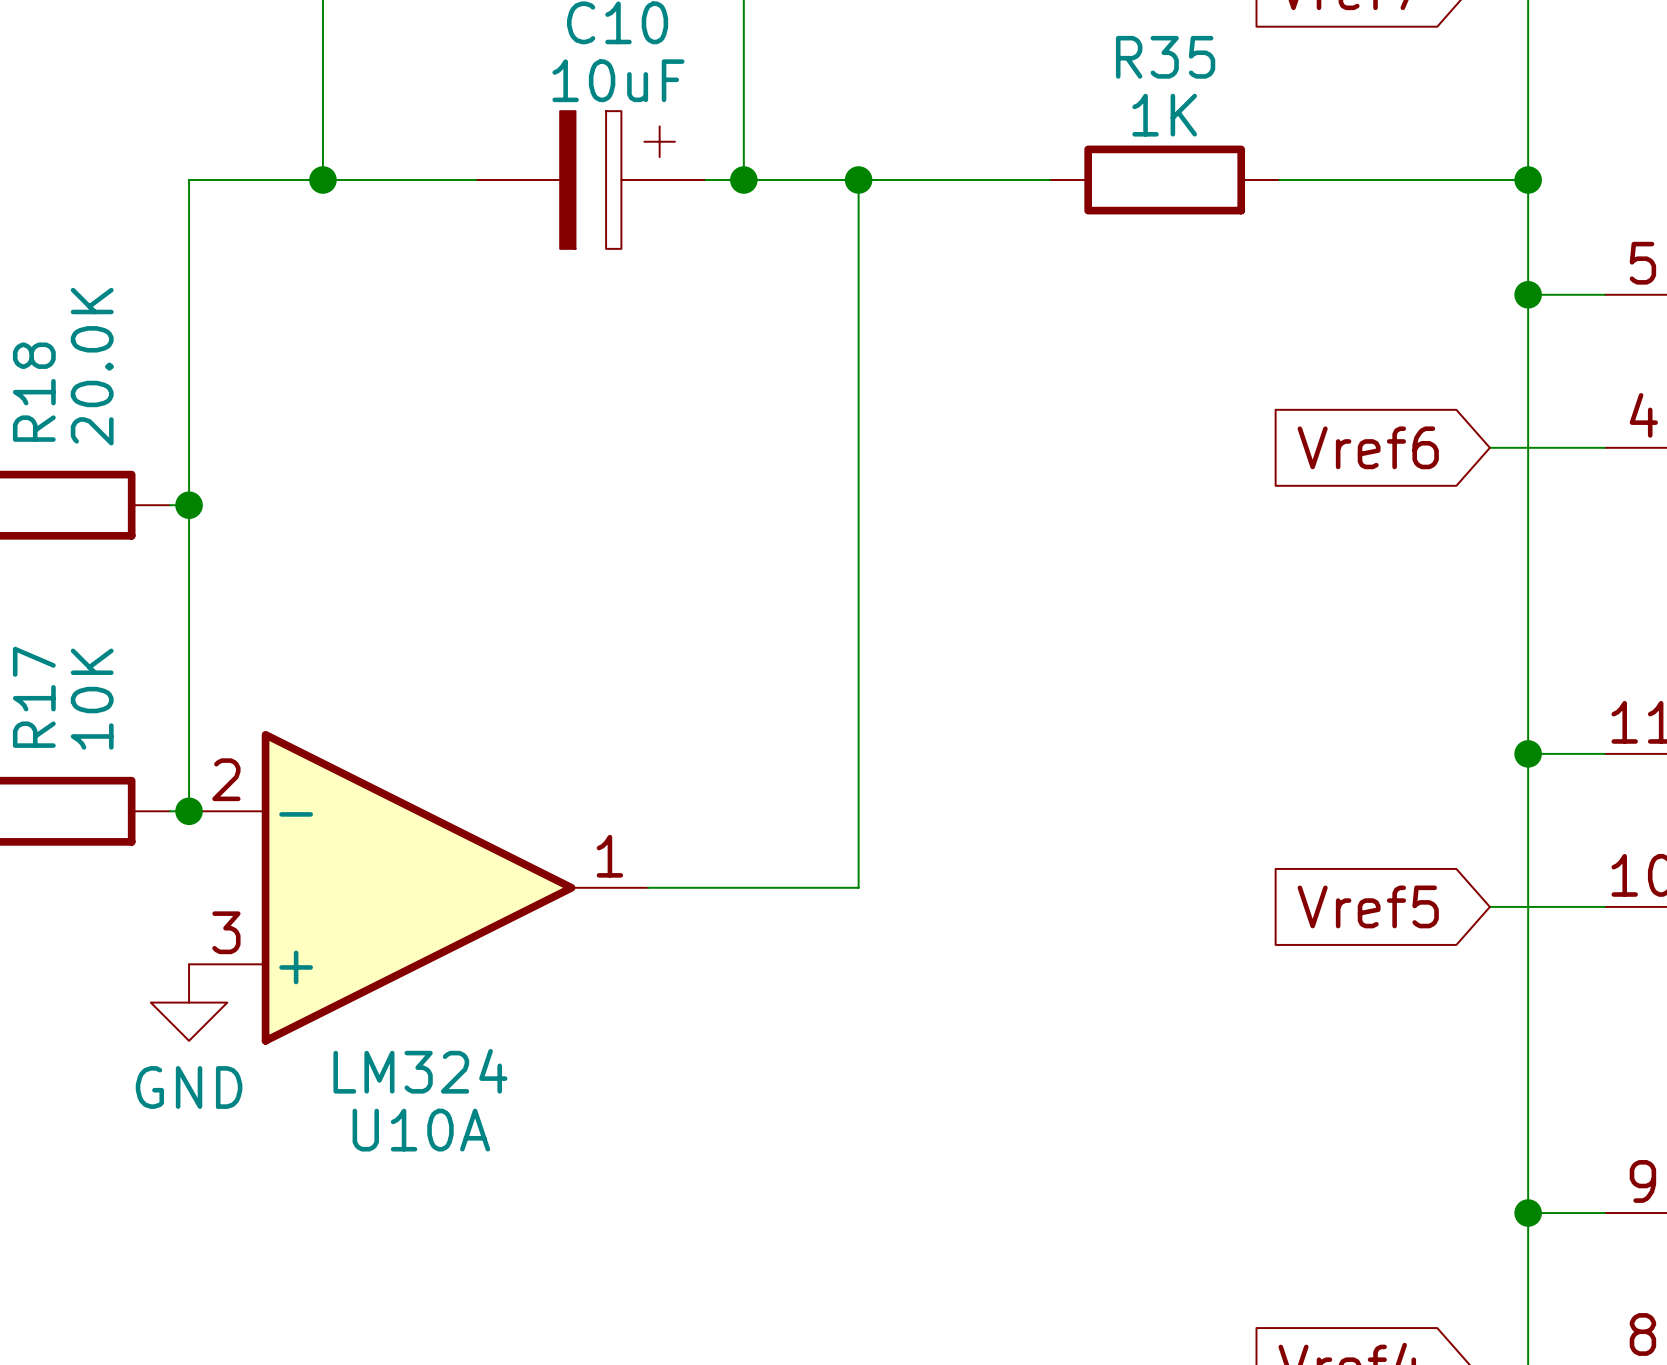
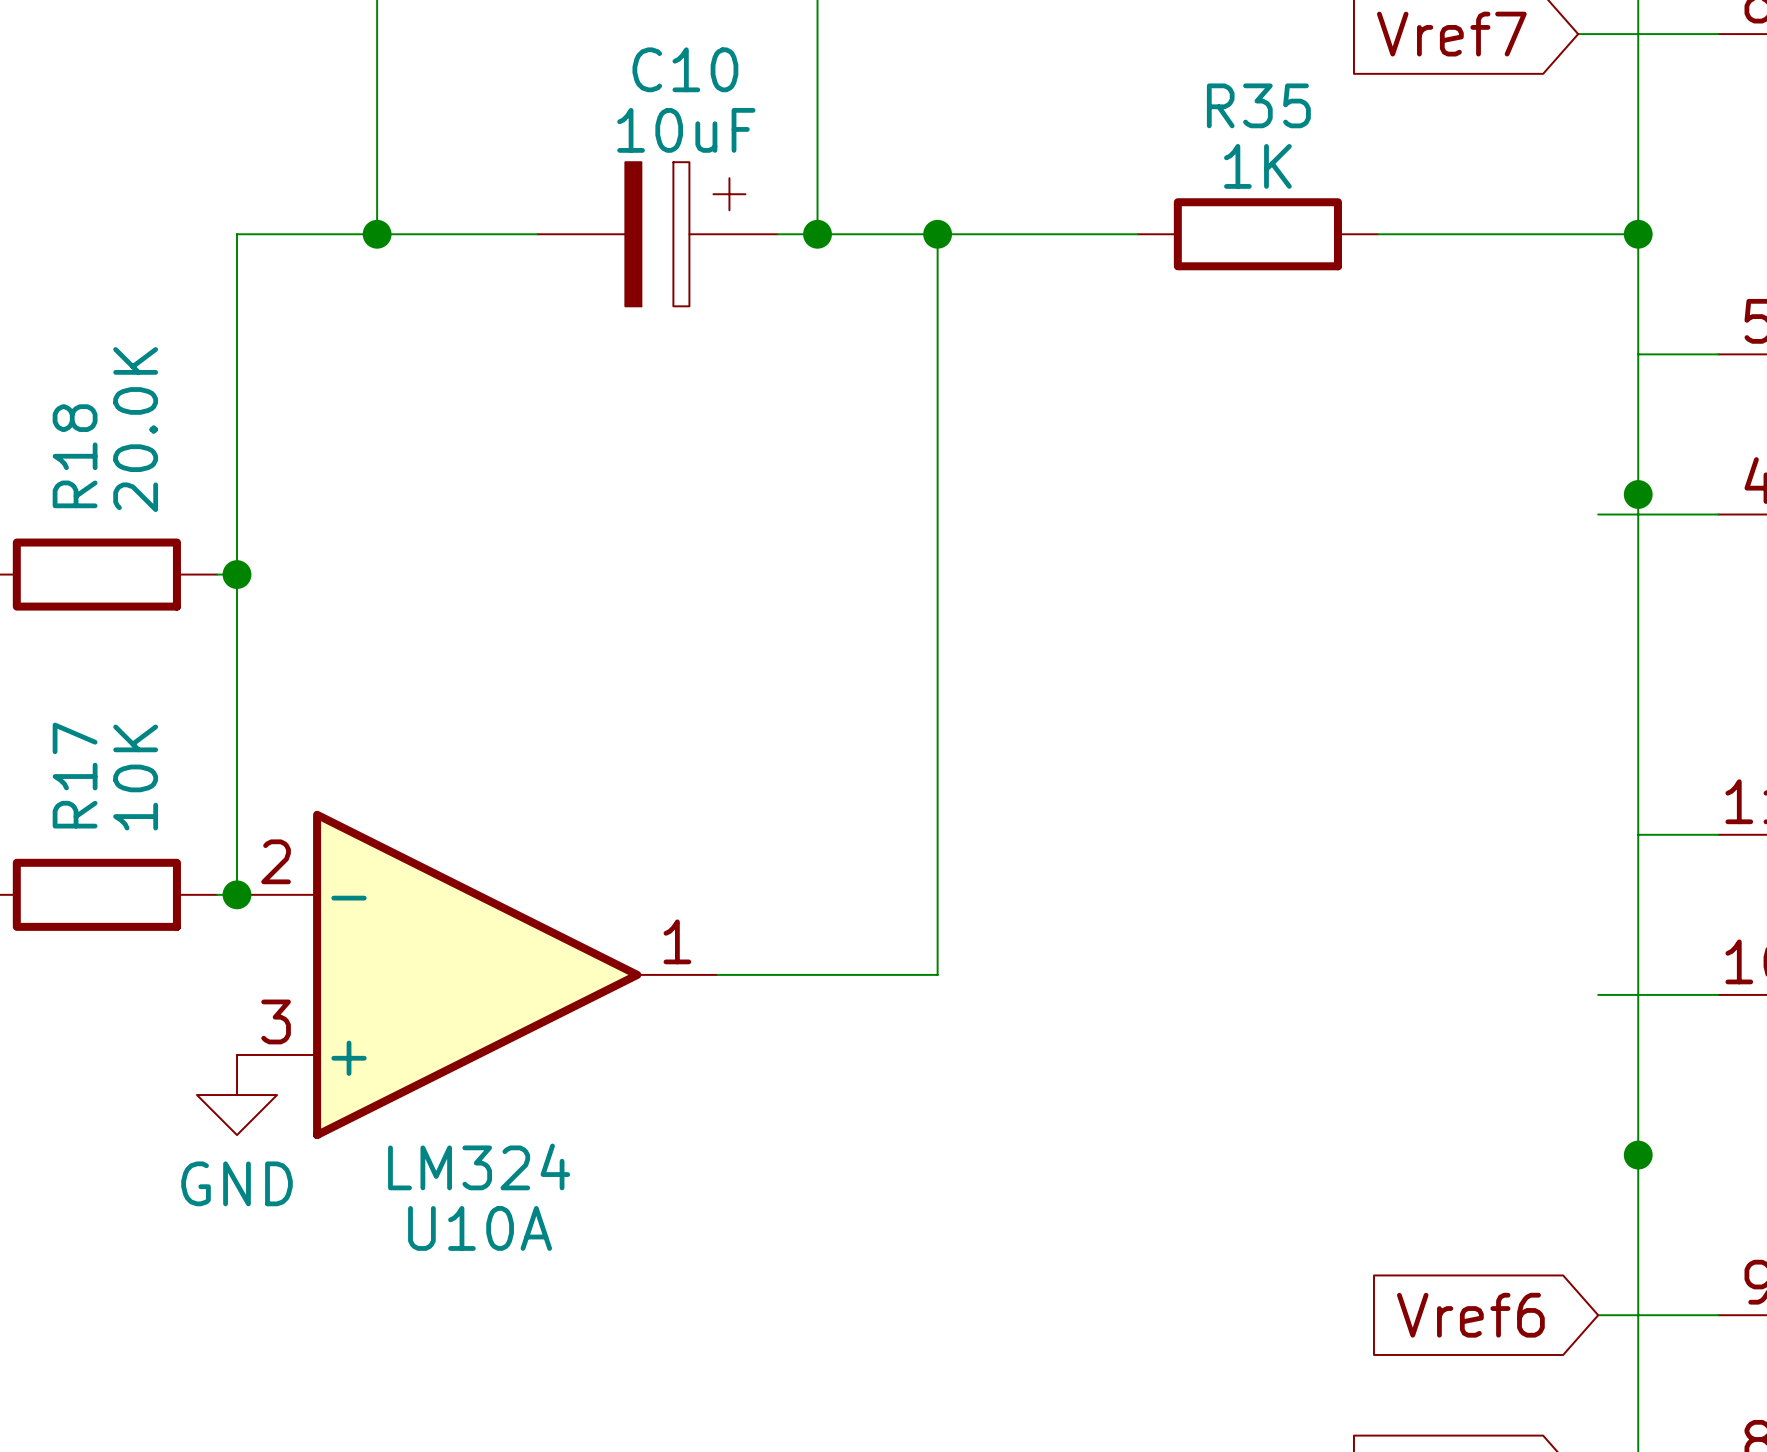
junction position: (1528, 294) -> (1638, 494)
global label: Vref6 (1368, 447) -> none
junction: (1528, 753) -> none
global label: Vref5 (1368, 906) -> none
junction: none -> (1638, 1155)
global label: none -> Vref6 (1470, 1315)
wire: none -> (1598, 1315) (1638, 1315)
junction: (1528, 1213) -> none

